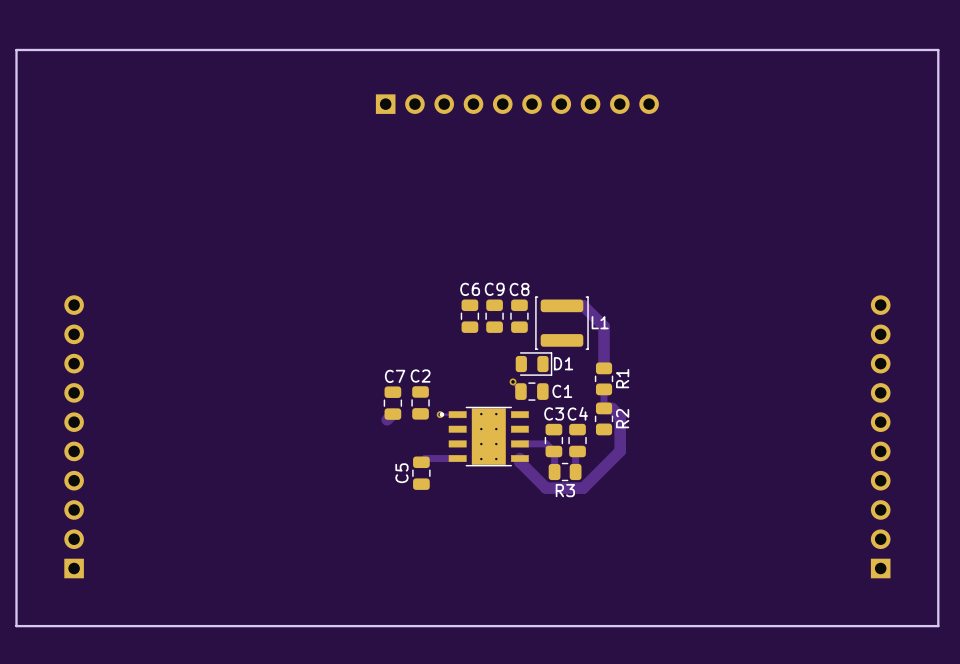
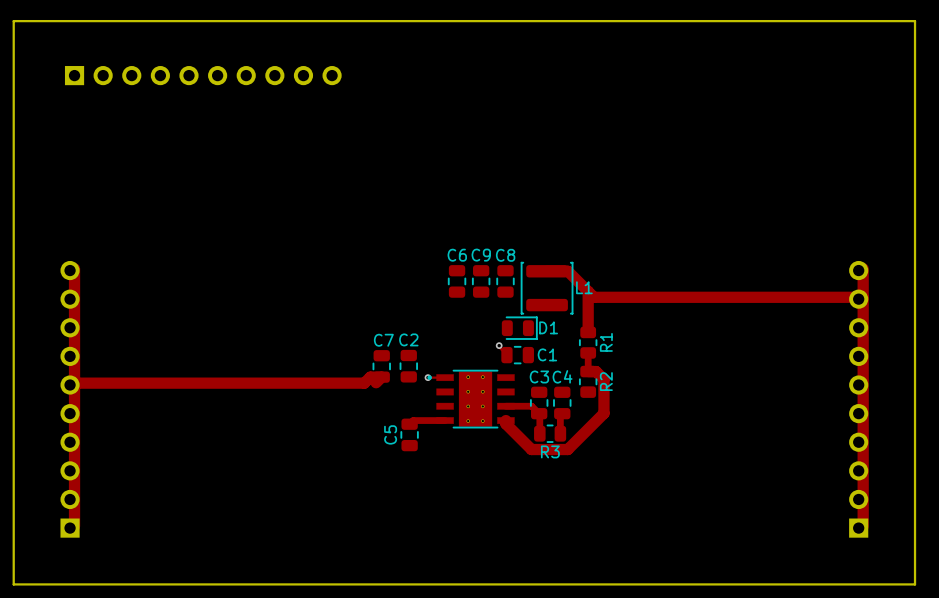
part: (517, 104) -> none
part: none -> (203, 75)
track: none -> (74, 268) (74, 526)
track: none -> (863, 268) (863, 526)
track: none -> (588, 291) (593, 297) (863, 297)
track: none -> (381, 377) (370, 377) (364, 383) (74, 383)

